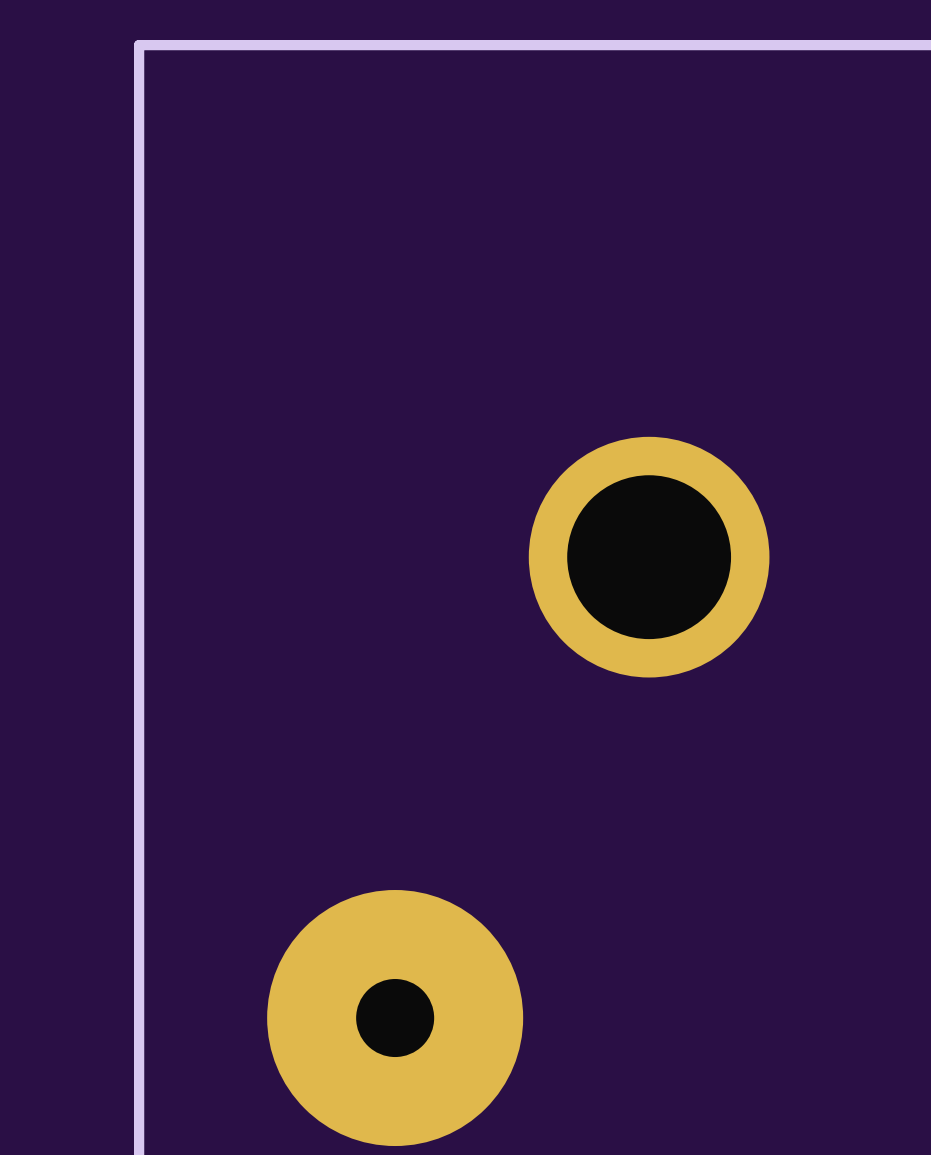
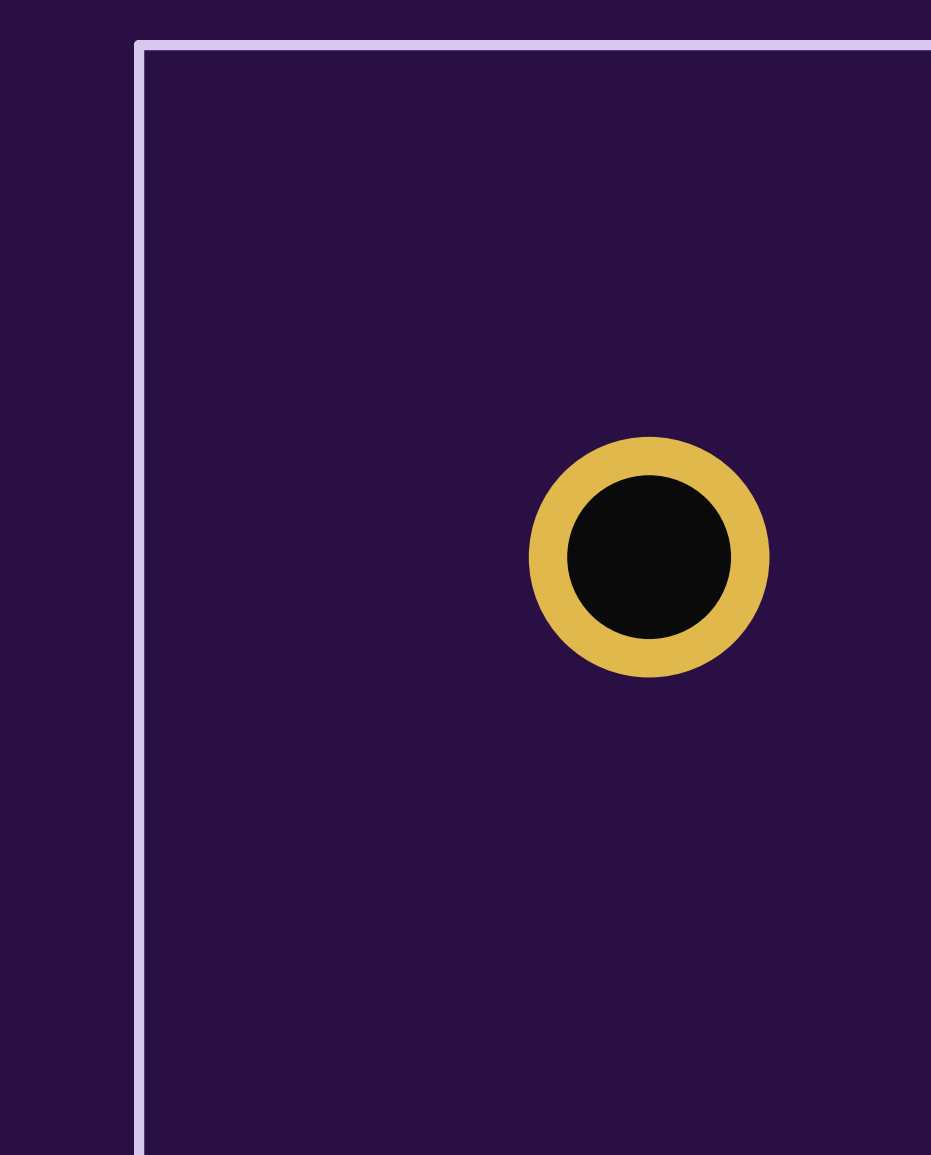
part: (395, 1018) -> none

